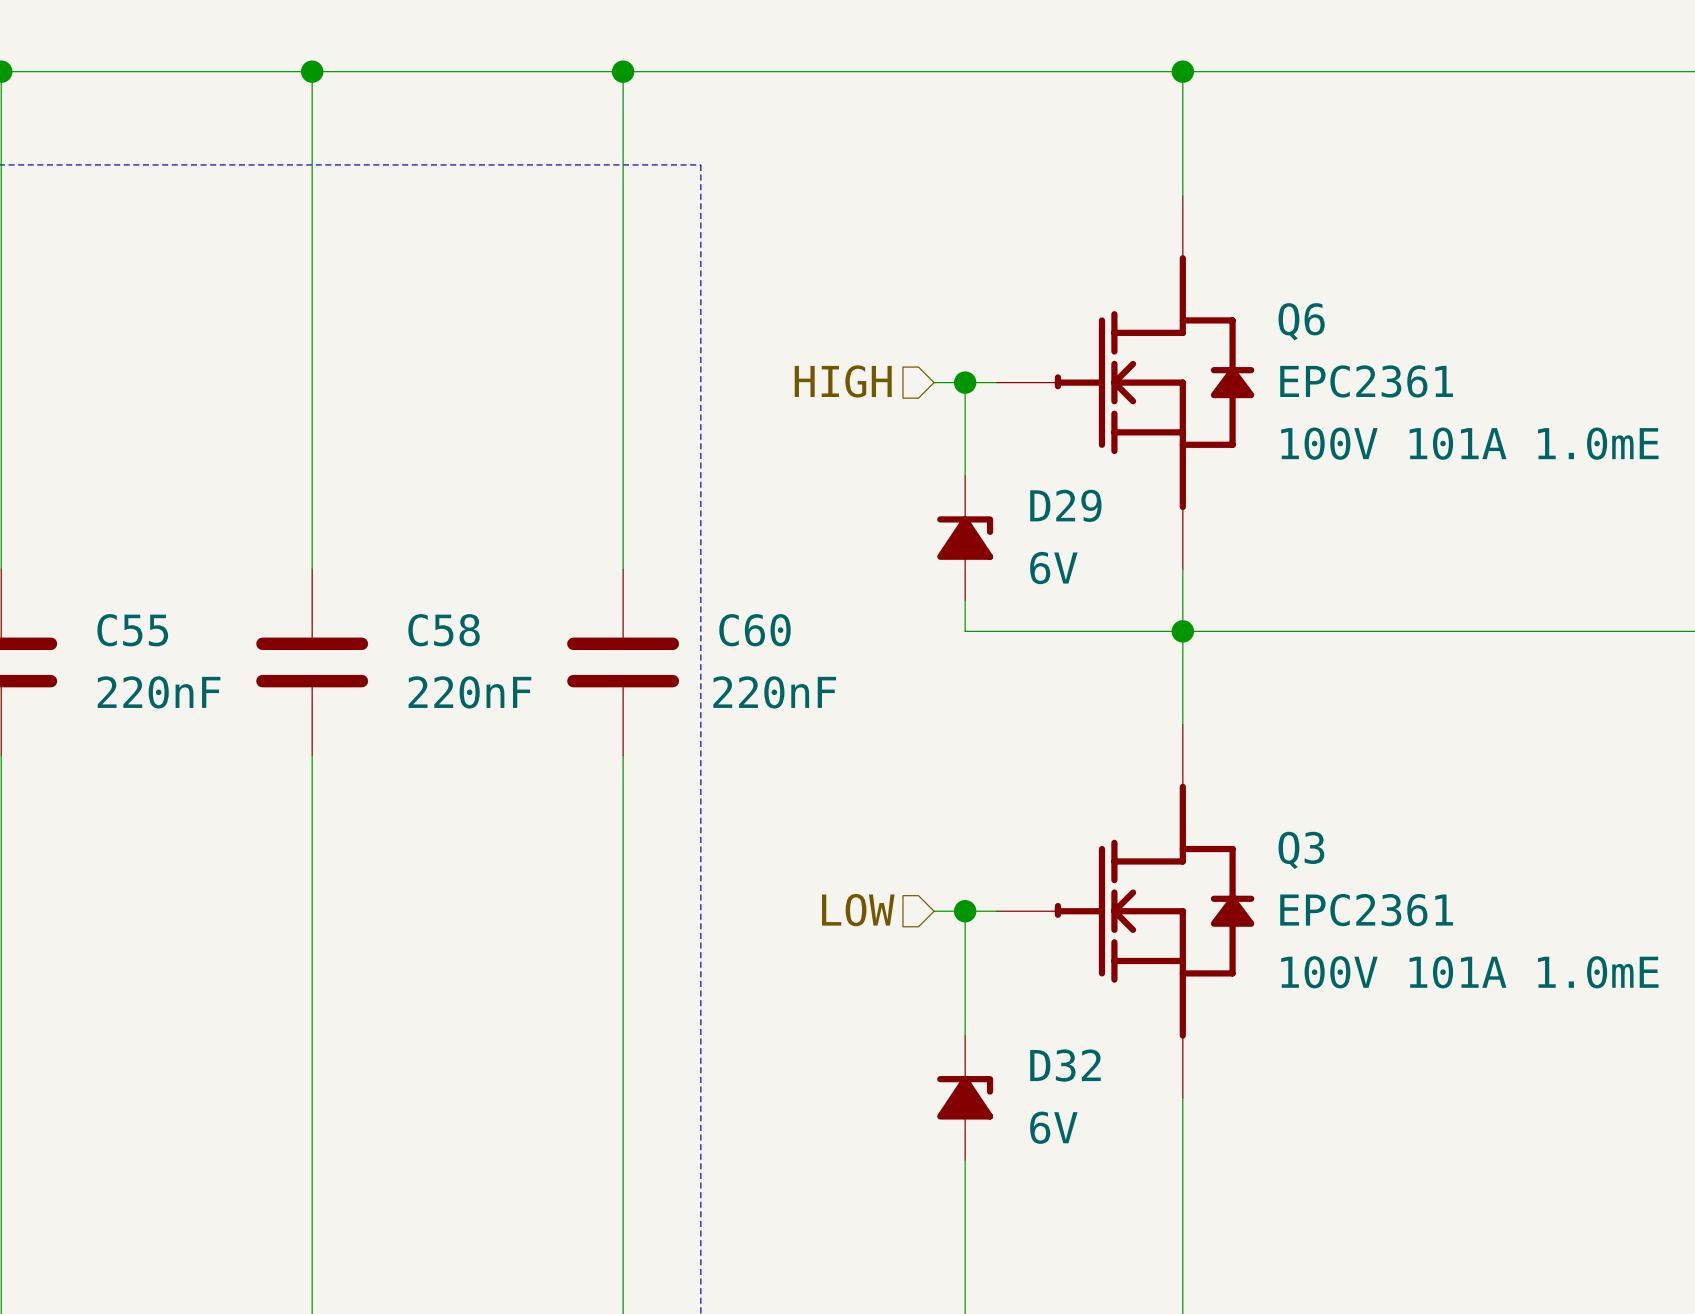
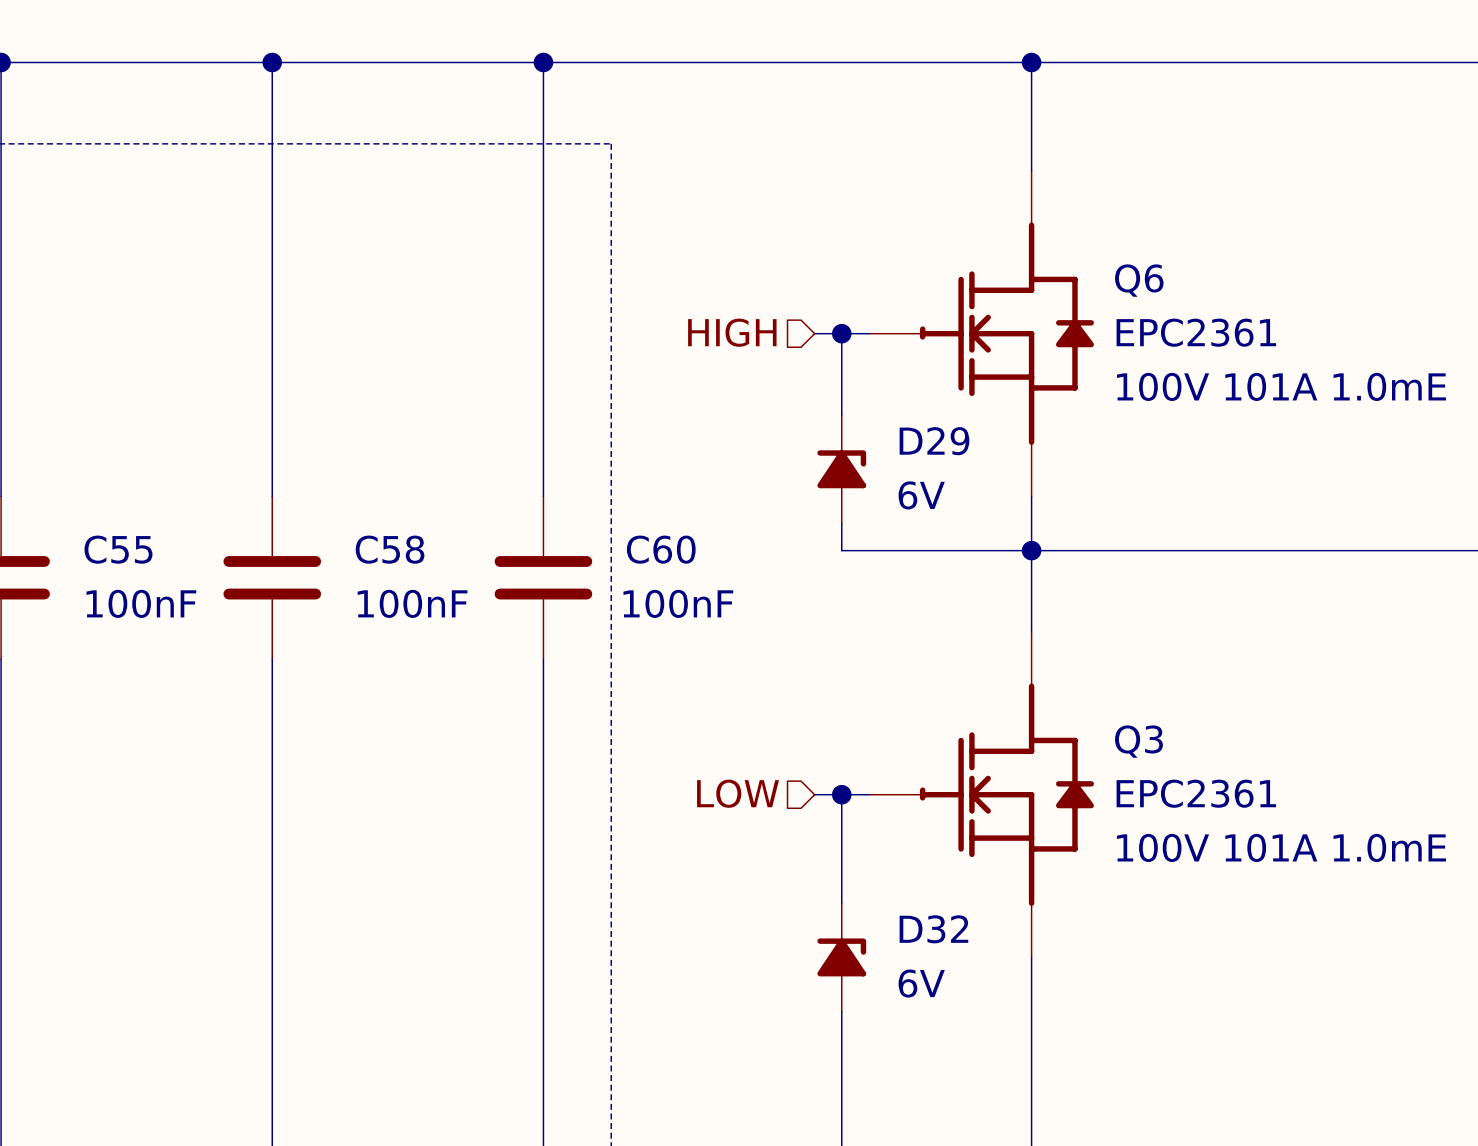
C55 value: 220nF (159, 692) -> 100nF (141, 603)
C58 value: 220nF (469, 692) -> 100nF (412, 603)
C60 value: 220nF (774, 692) -> 100nF (678, 603)

